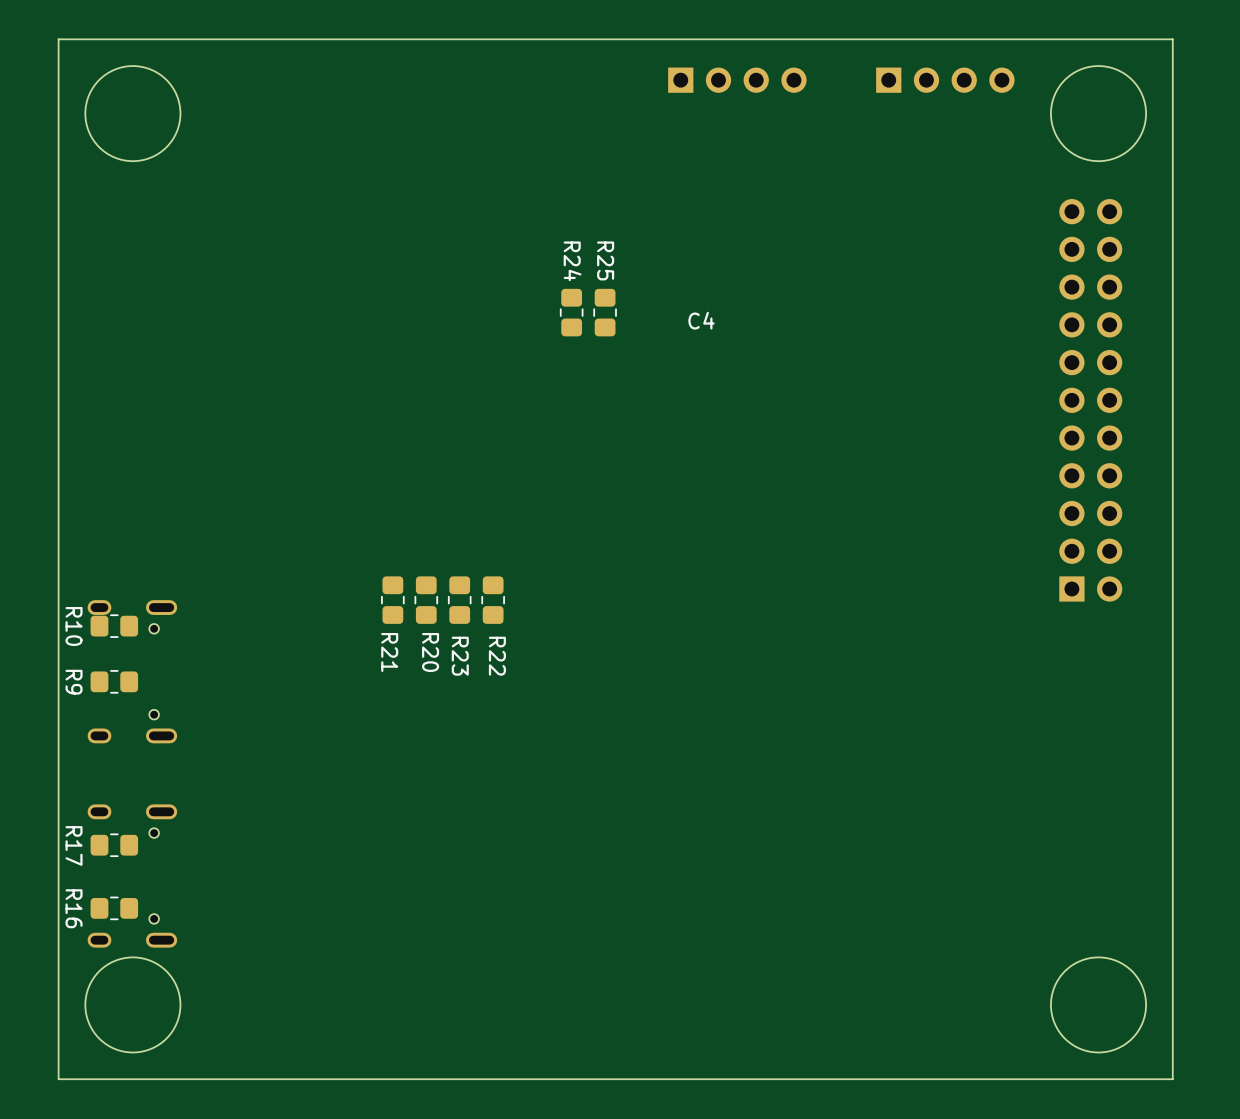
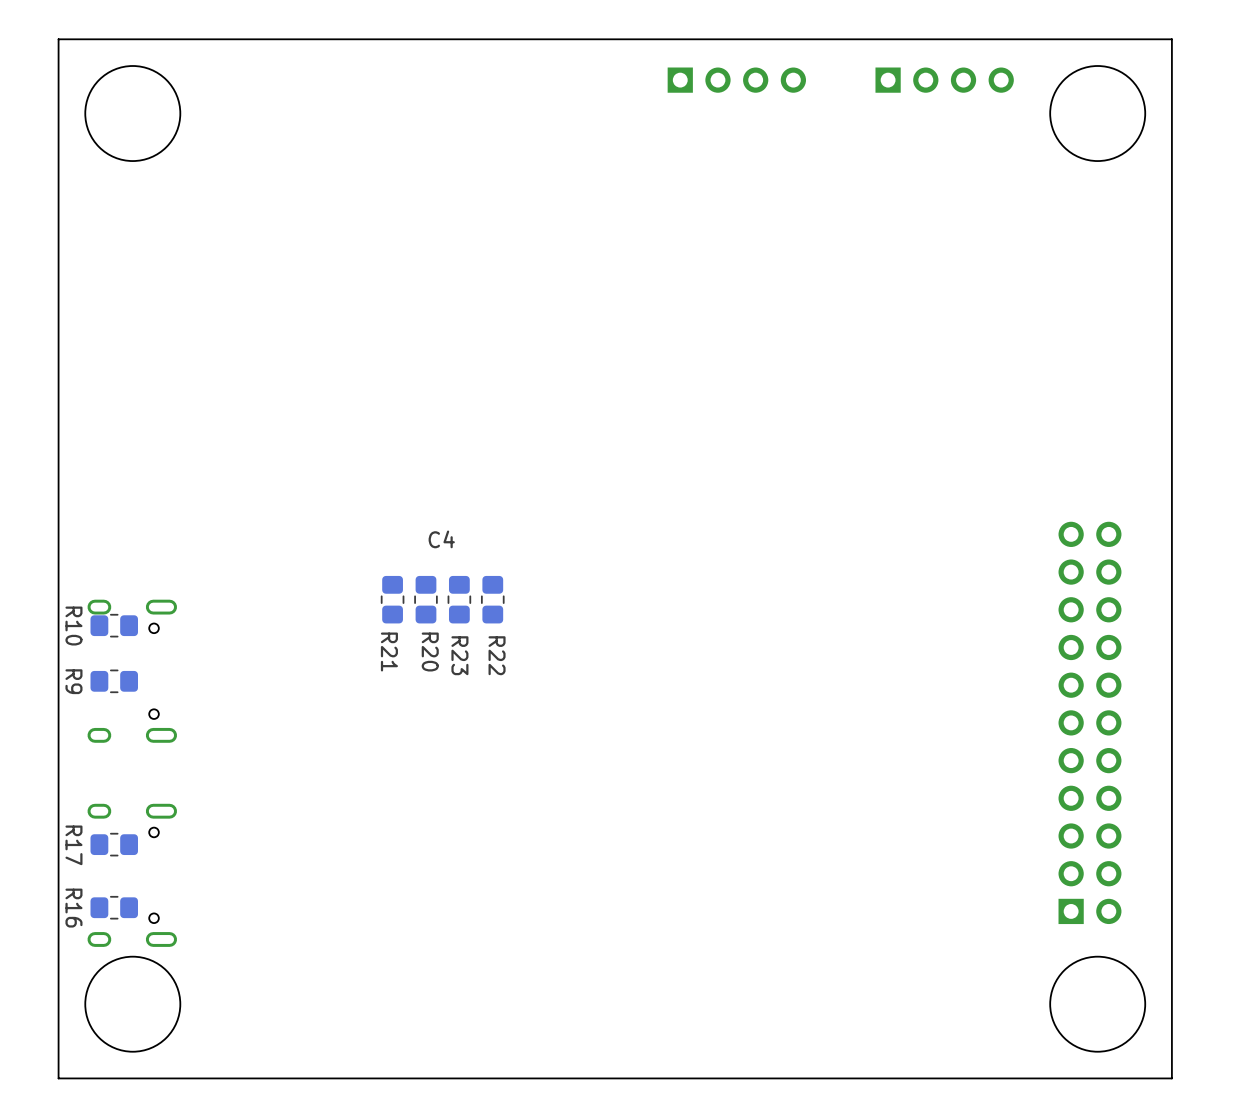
R24: (571, 312) -> none
R25: (605, 312) -> none
C4 position: (701, 320) -> (441, 539)
part position: (1090, 400) -> (1089, 722)

